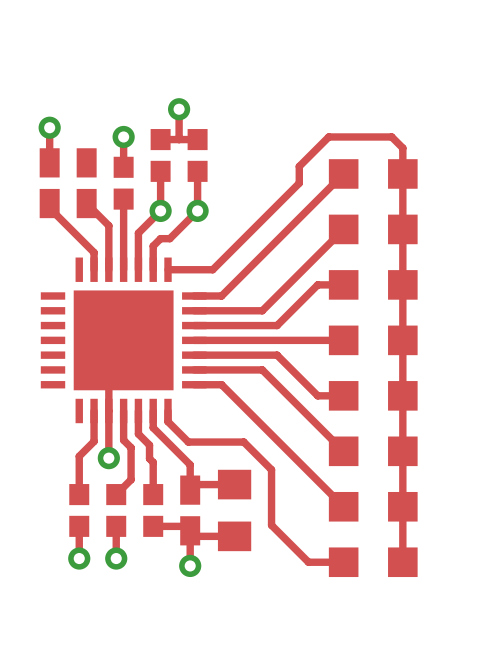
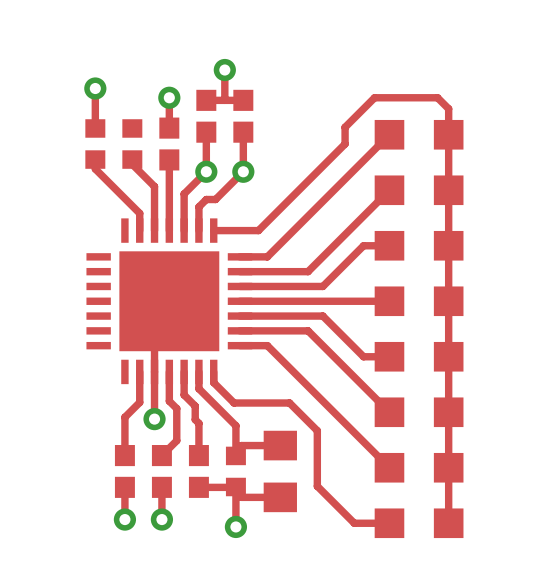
part footprint: [39, 148, 60, 219] -> [85, 119, 106, 169]
part footprint: [76, 148, 97, 219] -> [122, 119, 143, 169]
part footprint: [180, 475, 201, 546] -> [225, 446, 246, 497]

